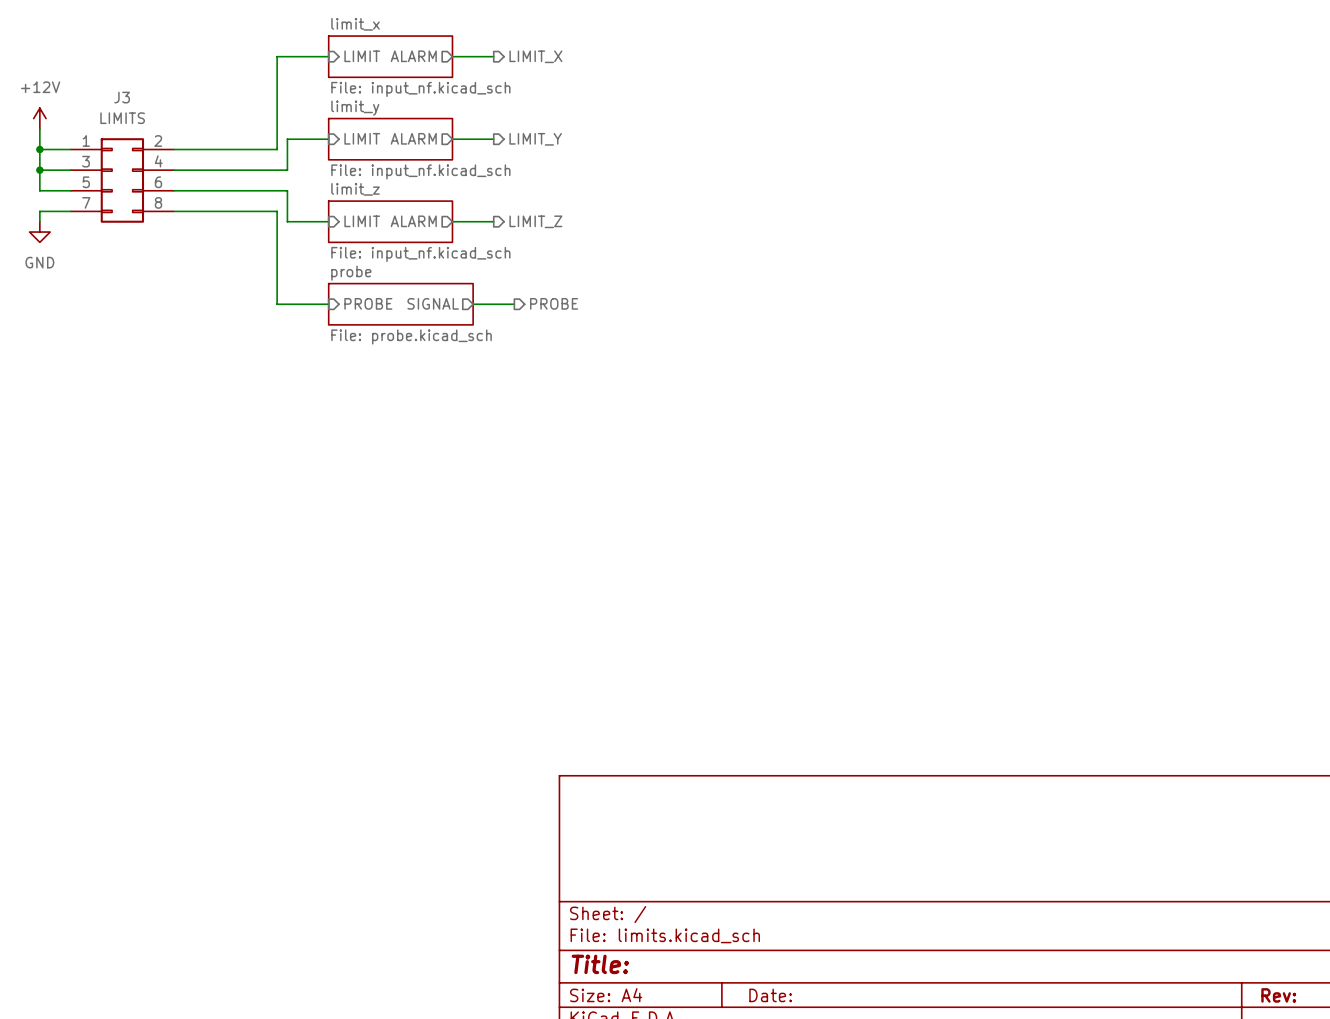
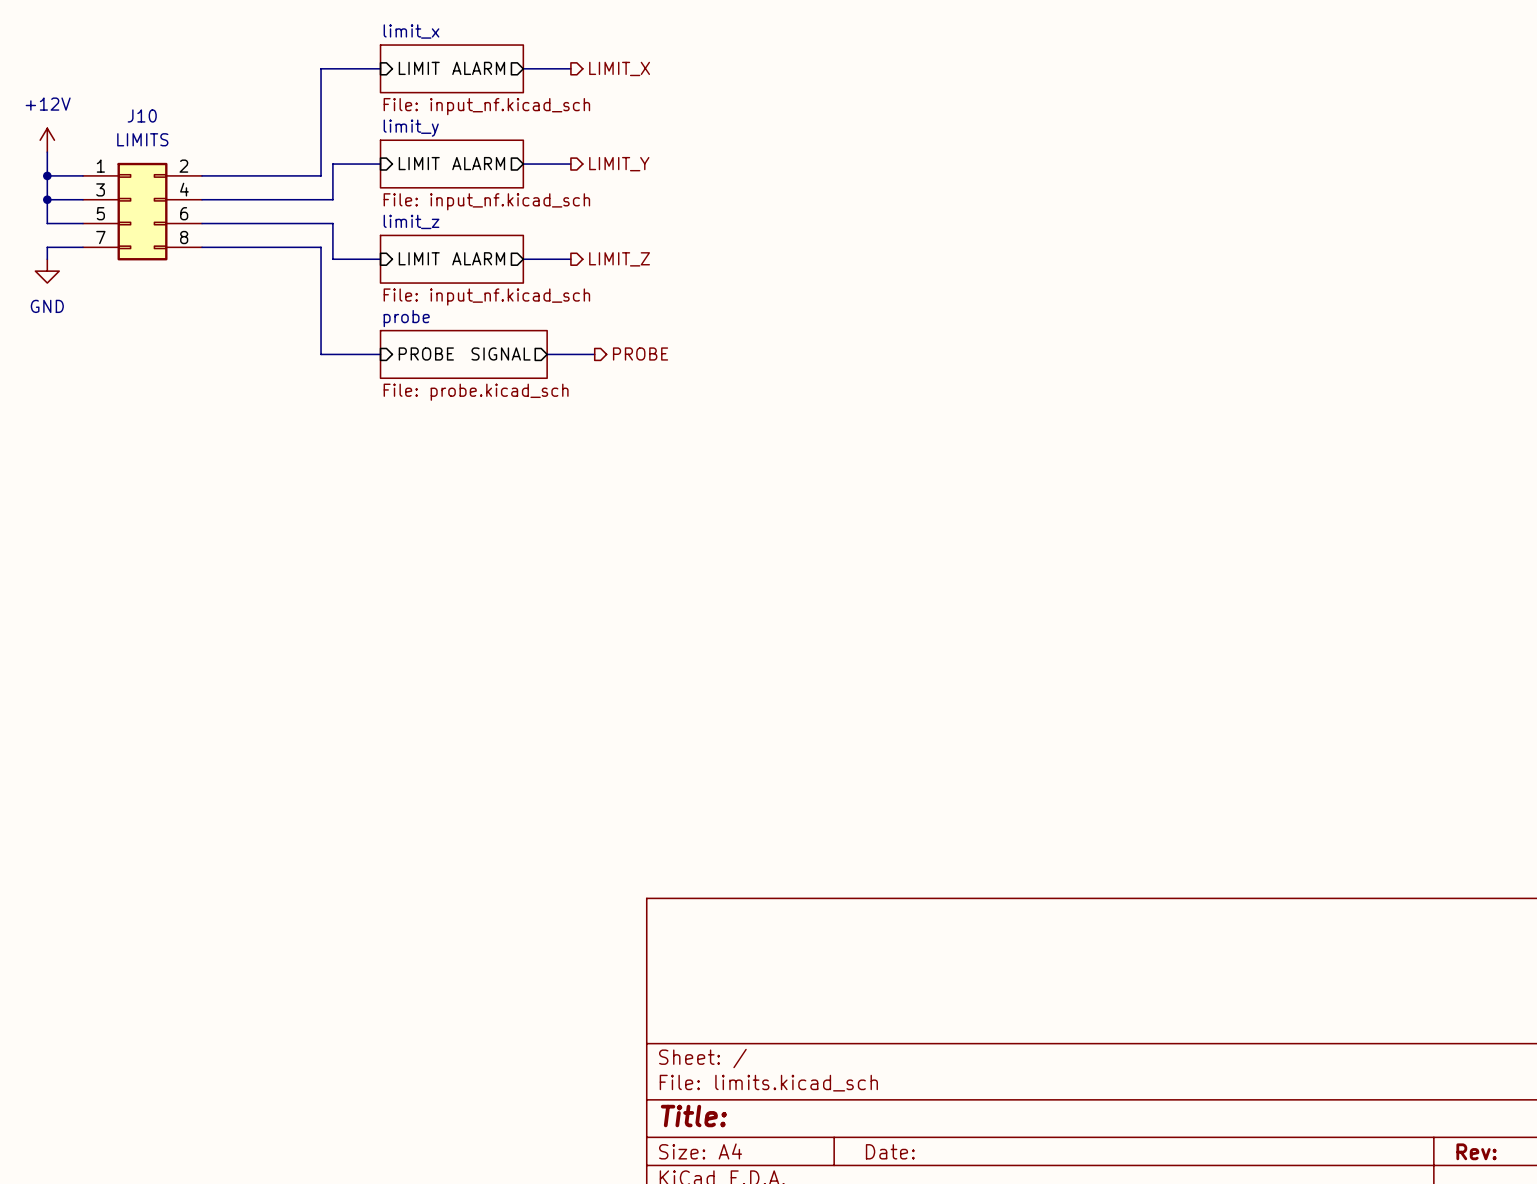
J3 name: J3 (122, 97) -> J10 (142, 115)

